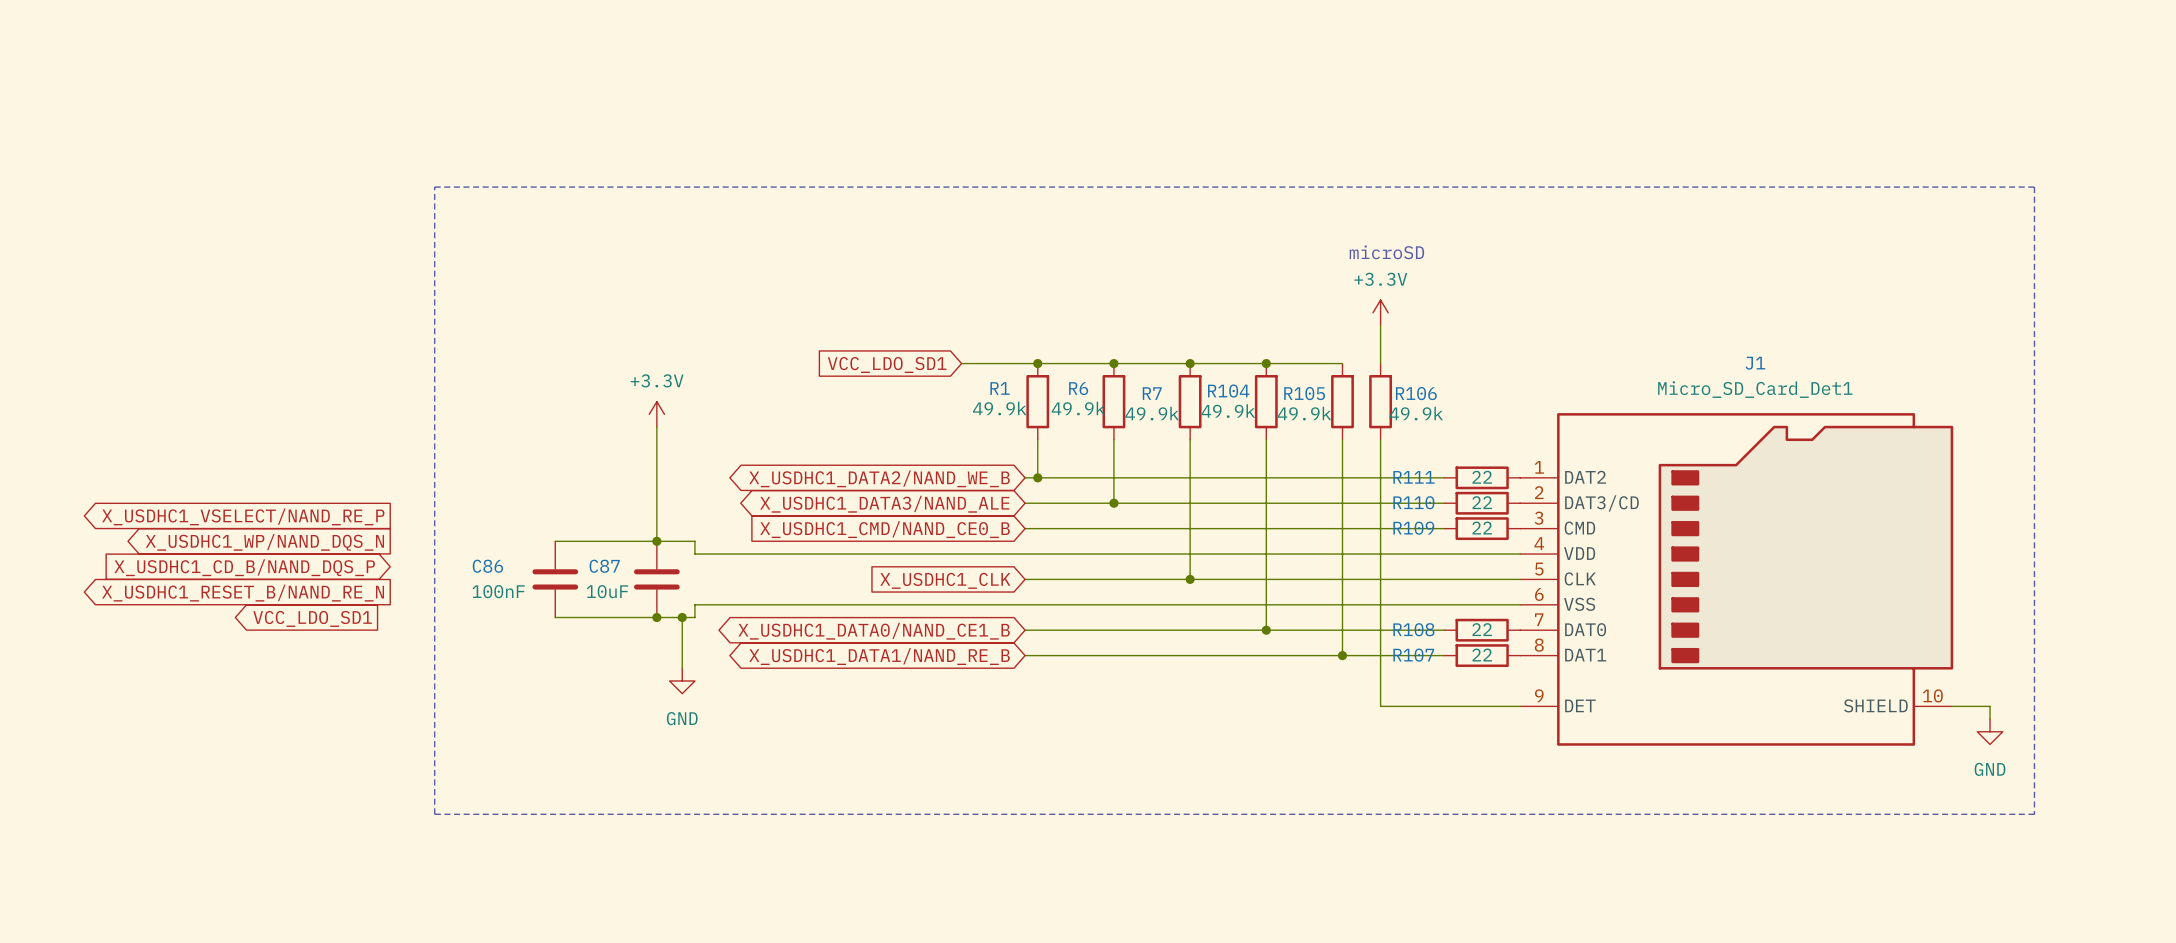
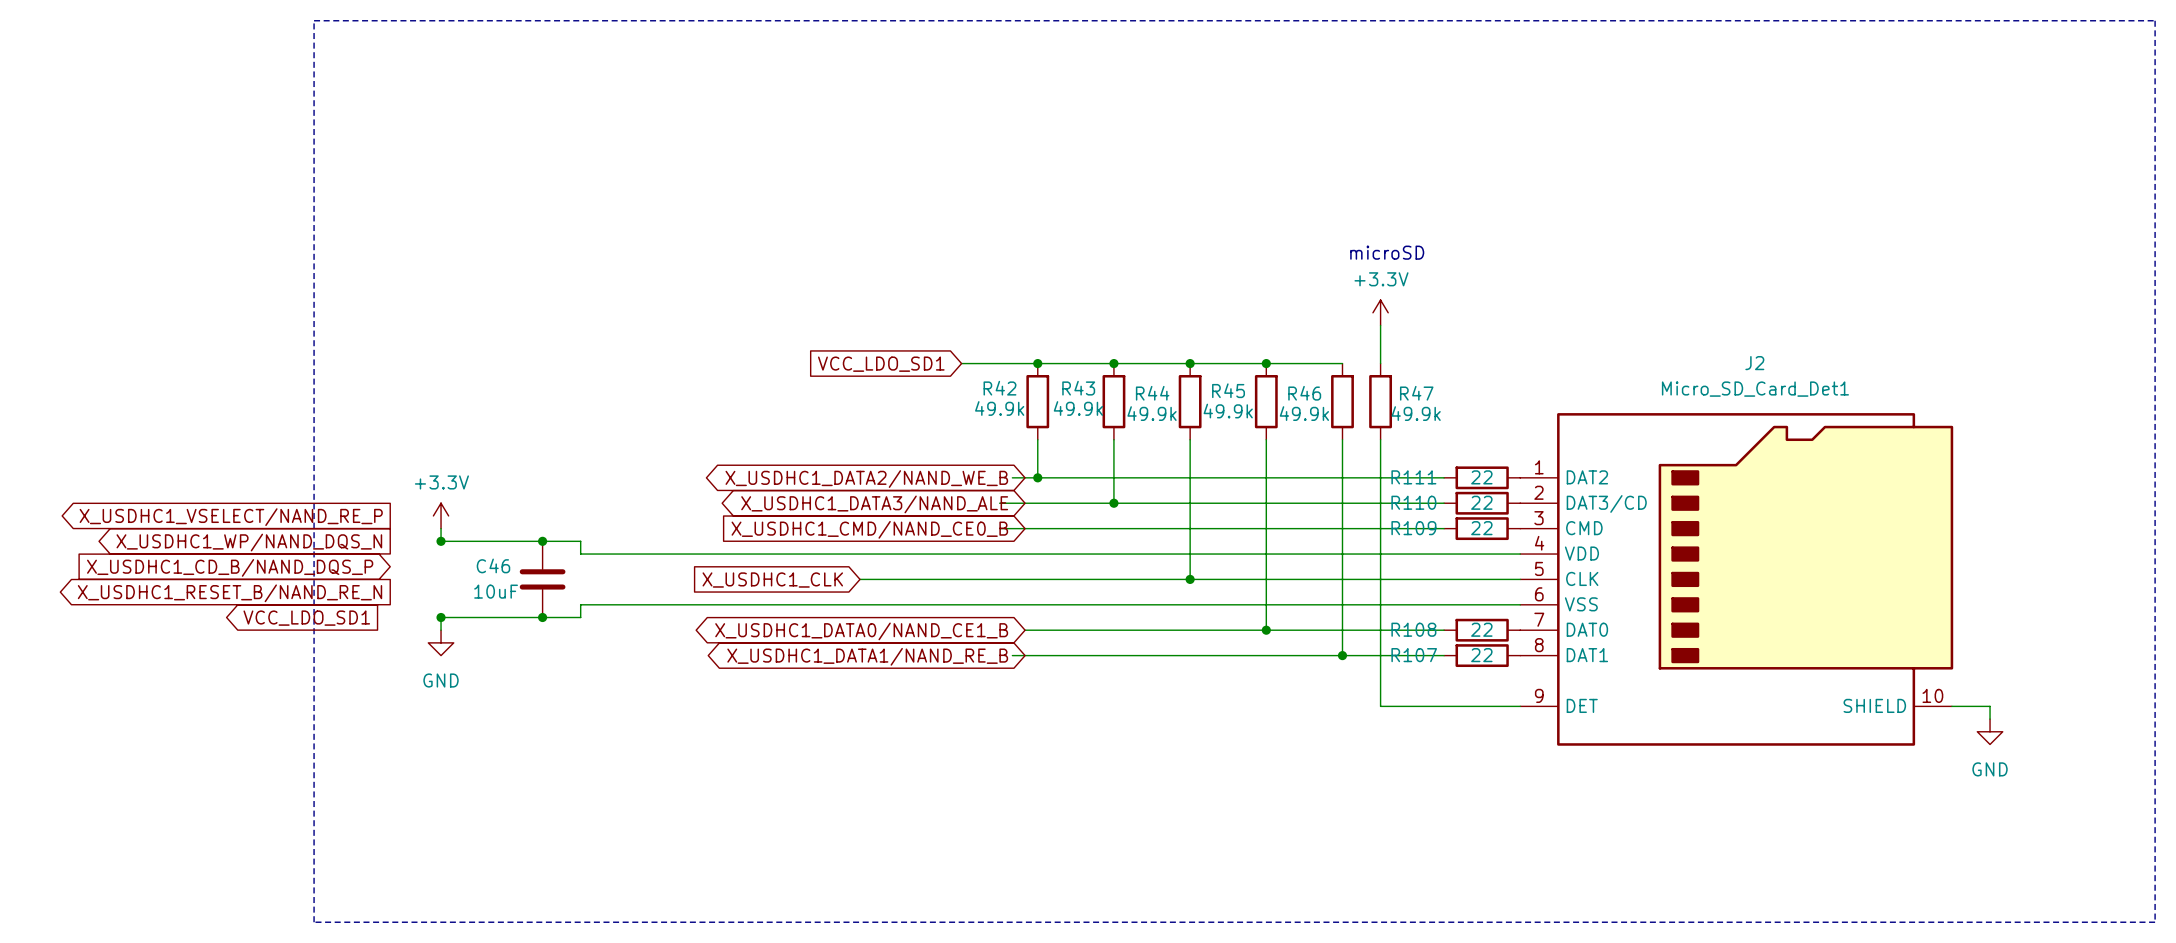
line: (434, 187) (2034, 187) (2034, 814) (434, 814) (434, 187) -> (314, 20) (314, 922) (2155, 922) (2155, 20) (314, 20)
J1 name: J1 (1755, 363) -> J2 (1754, 363)
R1 name: R1 (1000, 388) -> R42 (999, 388)
R6 name: R6 (1078, 388) -> R43 (1078, 388)
R104 name: R104 (1228, 391) -> R45 (1228, 390)
R7 name: R7 (1152, 393) -> R44 (1152, 393)
R105 name: R105 (1304, 393) -> R46 (1304, 393)
R106 name: R106 (1416, 393) -> R47 (1416, 393)
power symbol position: +3.3V (656, 414) -> +3.3V (441, 515)
wire: (656, 427) (656, 541) -> none
wire: none -> (1012, 477) (1025, 477)
wire: none -> (999, 503) (1025, 503)
wire: none -> (441, 528) (441, 541) (555, 541)
wire: none -> (999, 528) (1025, 528)
junction: none -> (441, 541)
junction: none -> (542, 541)
wire: (580, 541) (694, 541) (694, 554) -> (580, 541) (580, 554) (694, 554)
junction: (656, 541) -> none
C46: none -> 10uF (542, 579)
C86: 100nF (555, 579) -> none
C87: 10uF (656, 579) -> none
wire: none -> (860, 579) (1025, 579)
global label position: X_USDHC1_CLK (945, 580) -> X_USDHC1_CLK (772, 580)
wire: (694, 604) (694, 617) (580, 617) -> (694, 604) (580, 604) (580, 617)
junction: none -> (441, 617)
junction: none -> (542, 617)
wire: none -> (555, 617) (441, 617) (441, 630)
junction: (656, 617) -> none
wire: (682, 617) (682, 668) -> none
junction: (682, 617) -> none
wire: none -> (1012, 655) (1025, 655)
power symbol position: GND (682, 680) -> GND (441, 642)

